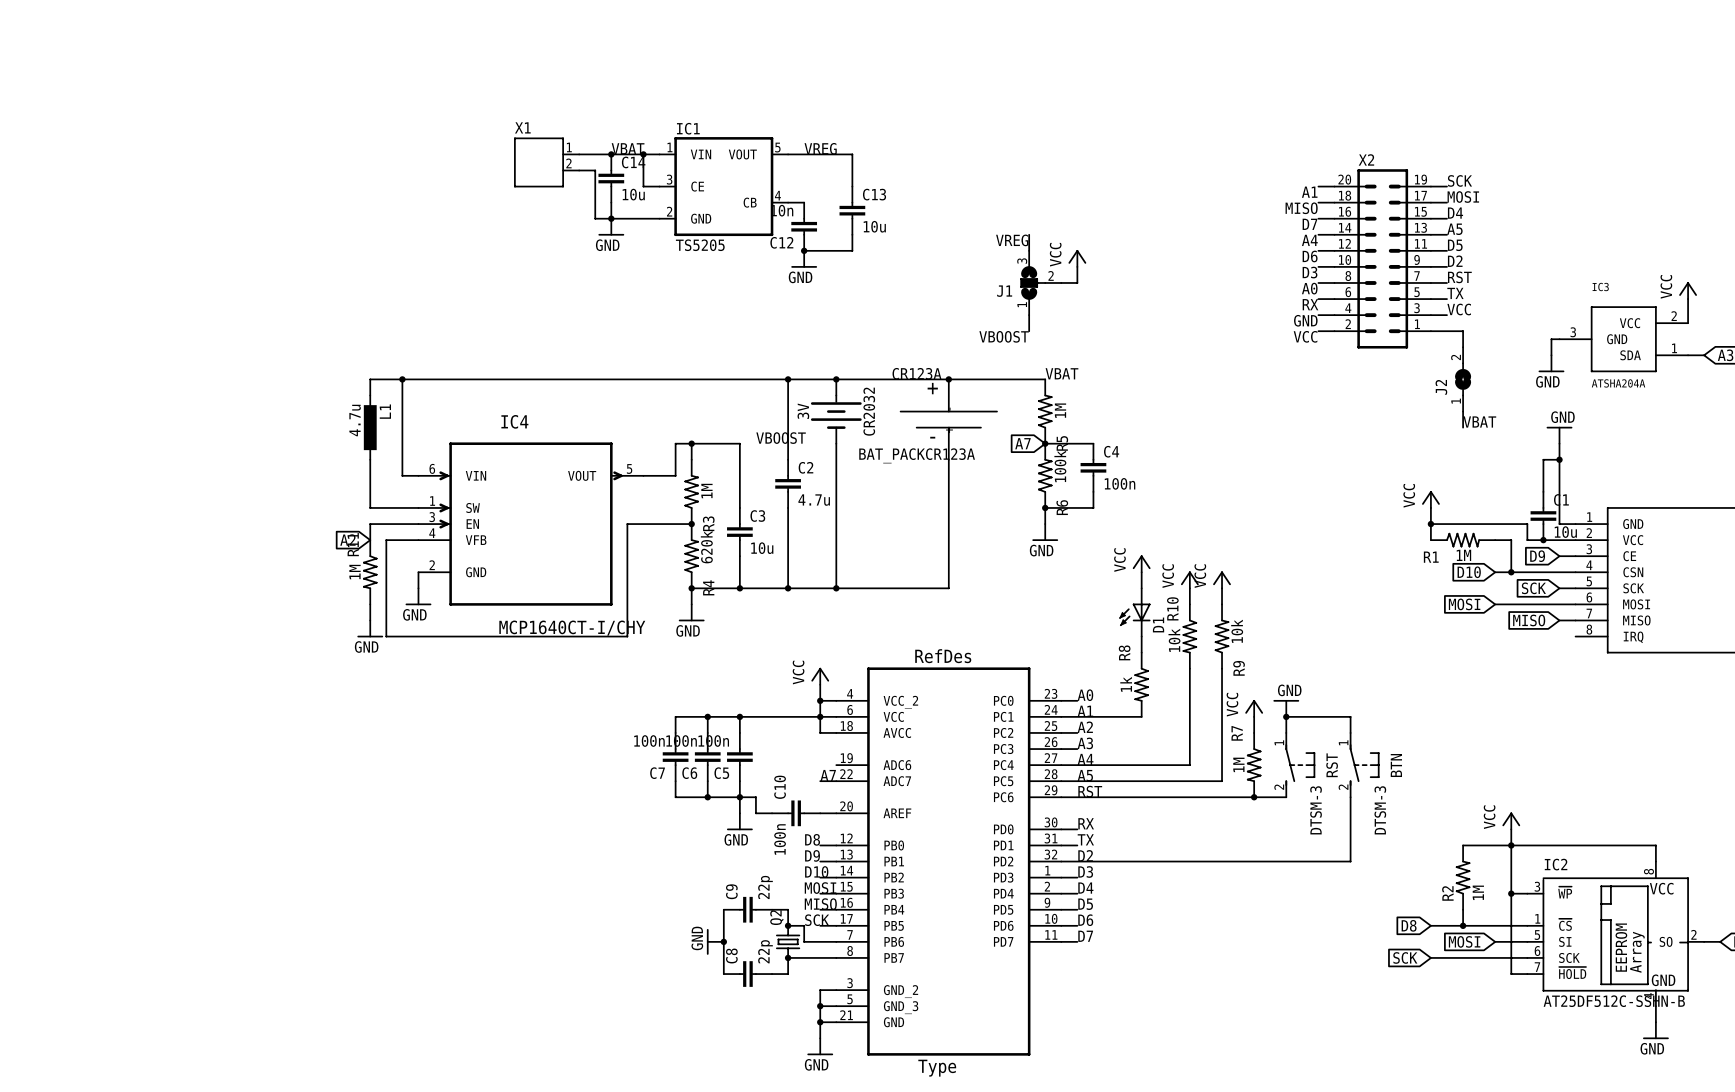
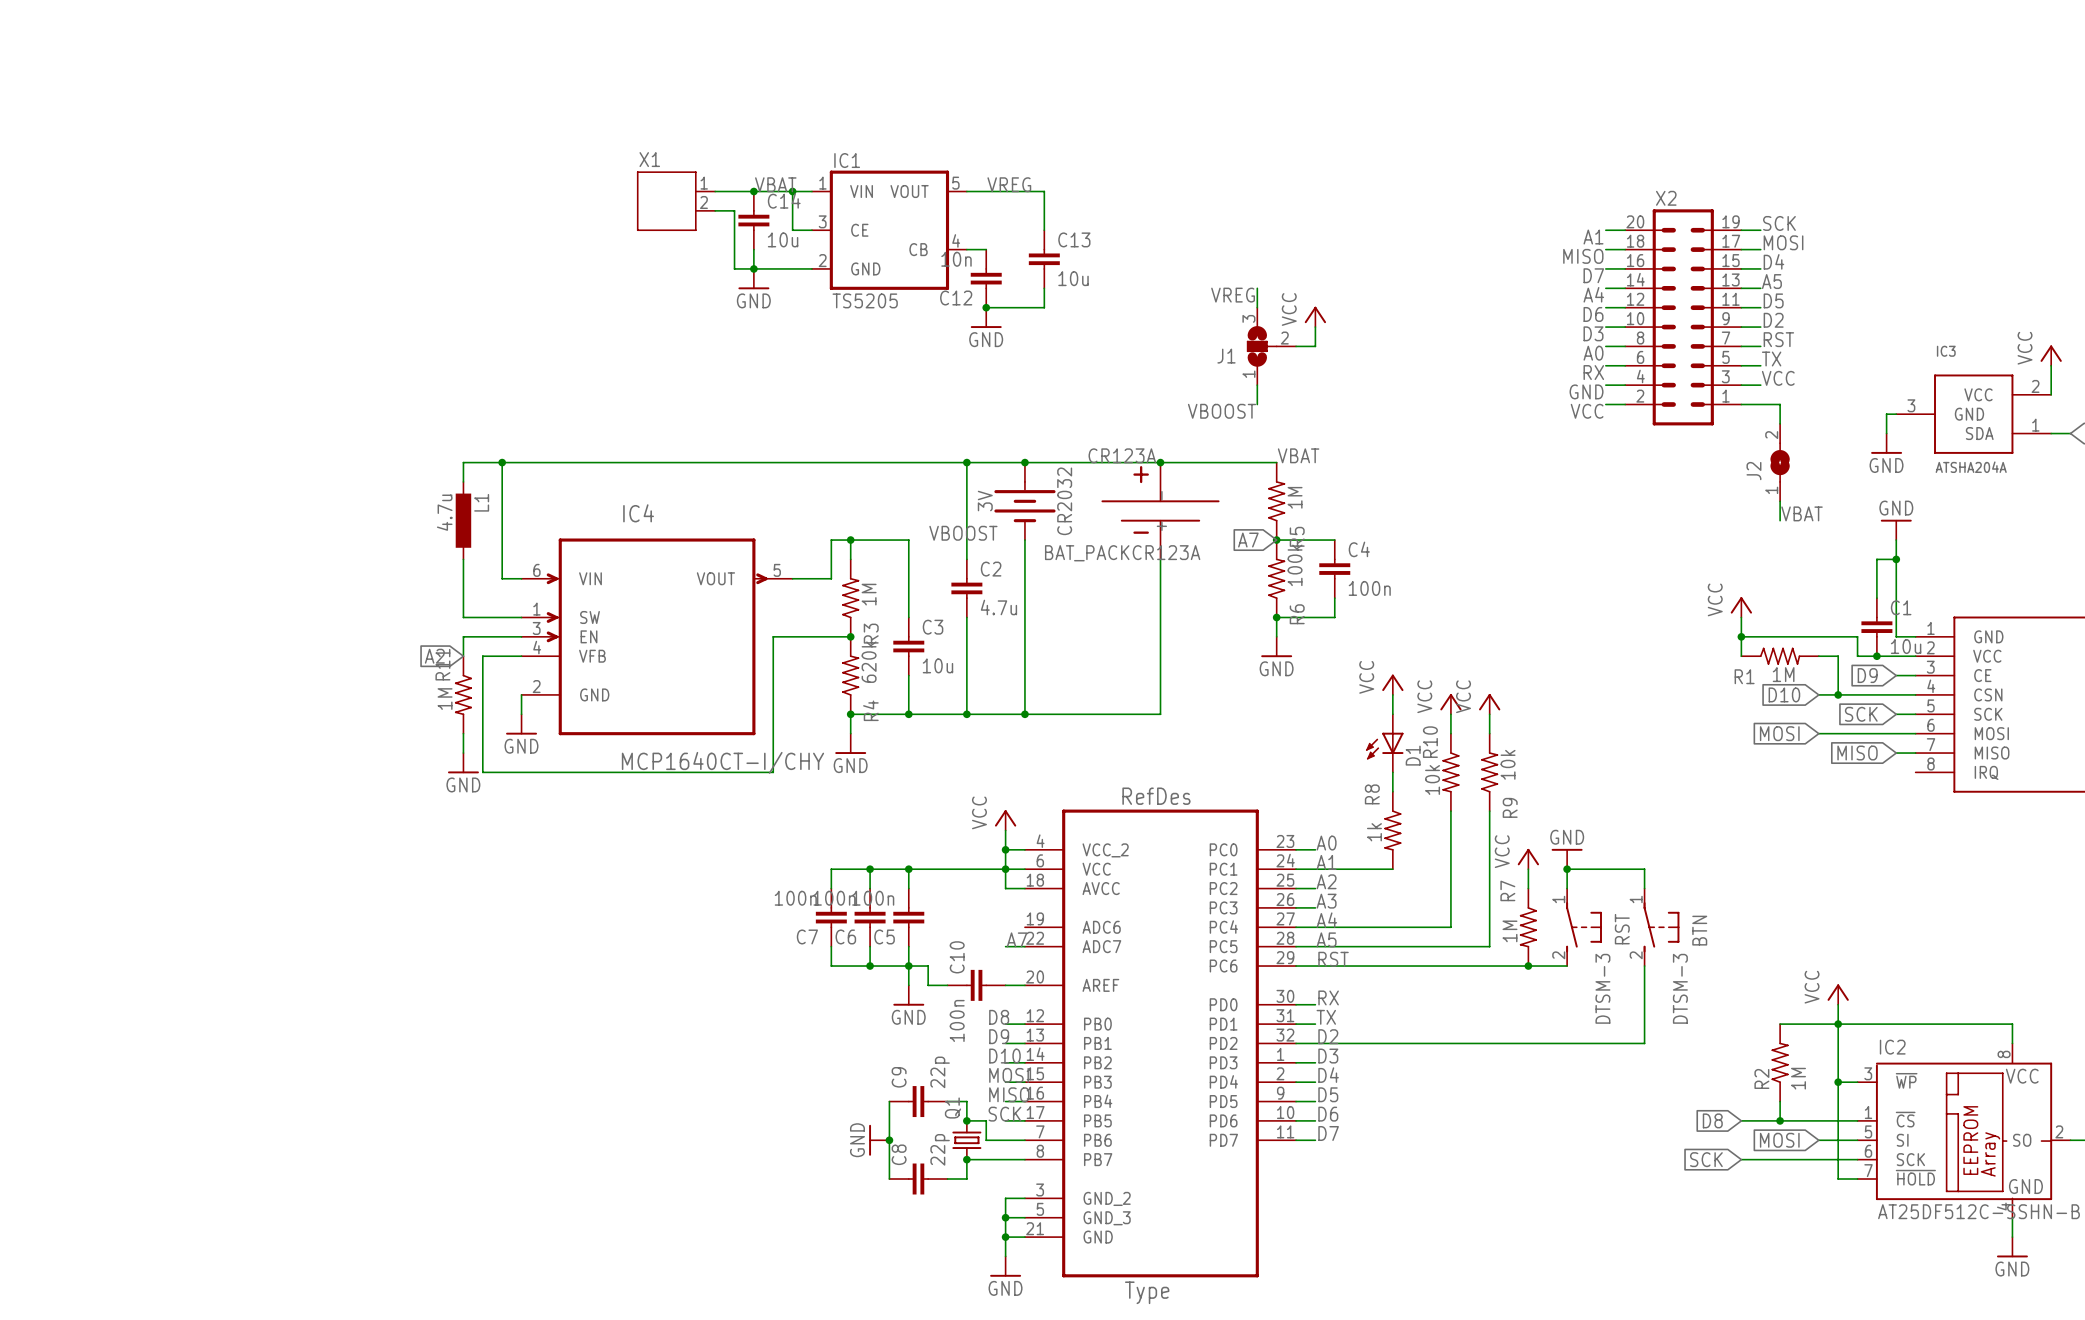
Q2 name: Q2 (776, 917) -> Q1 (953, 1108)

